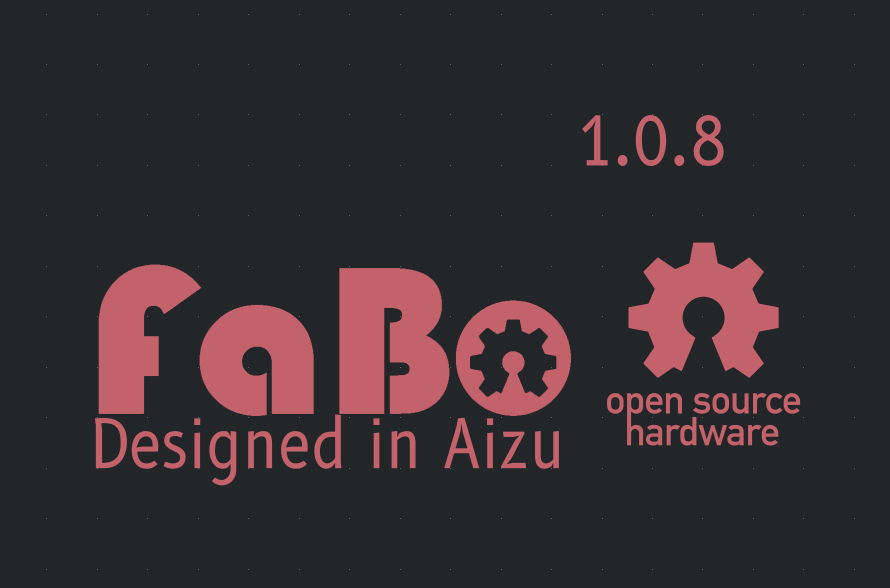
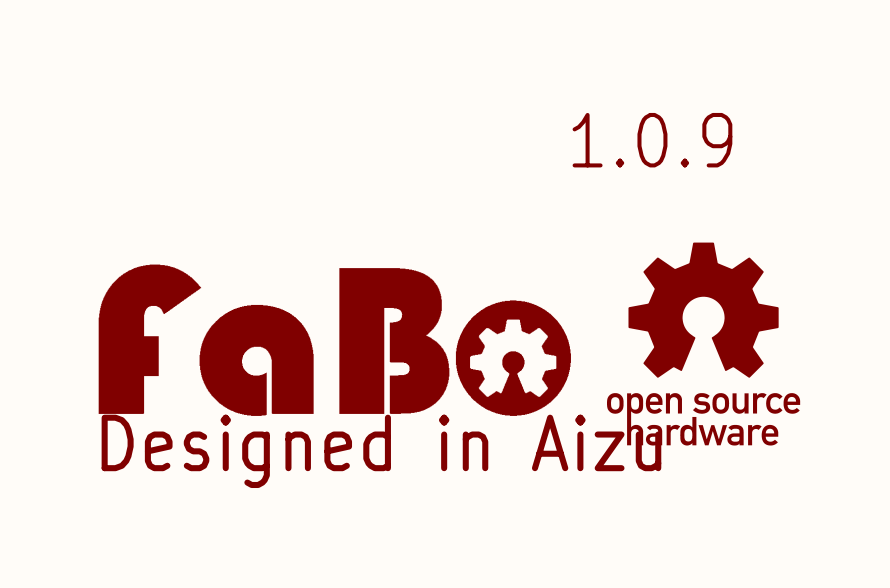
text: 1.0.8 (652, 140) -> 1.0.9 (652, 140)

